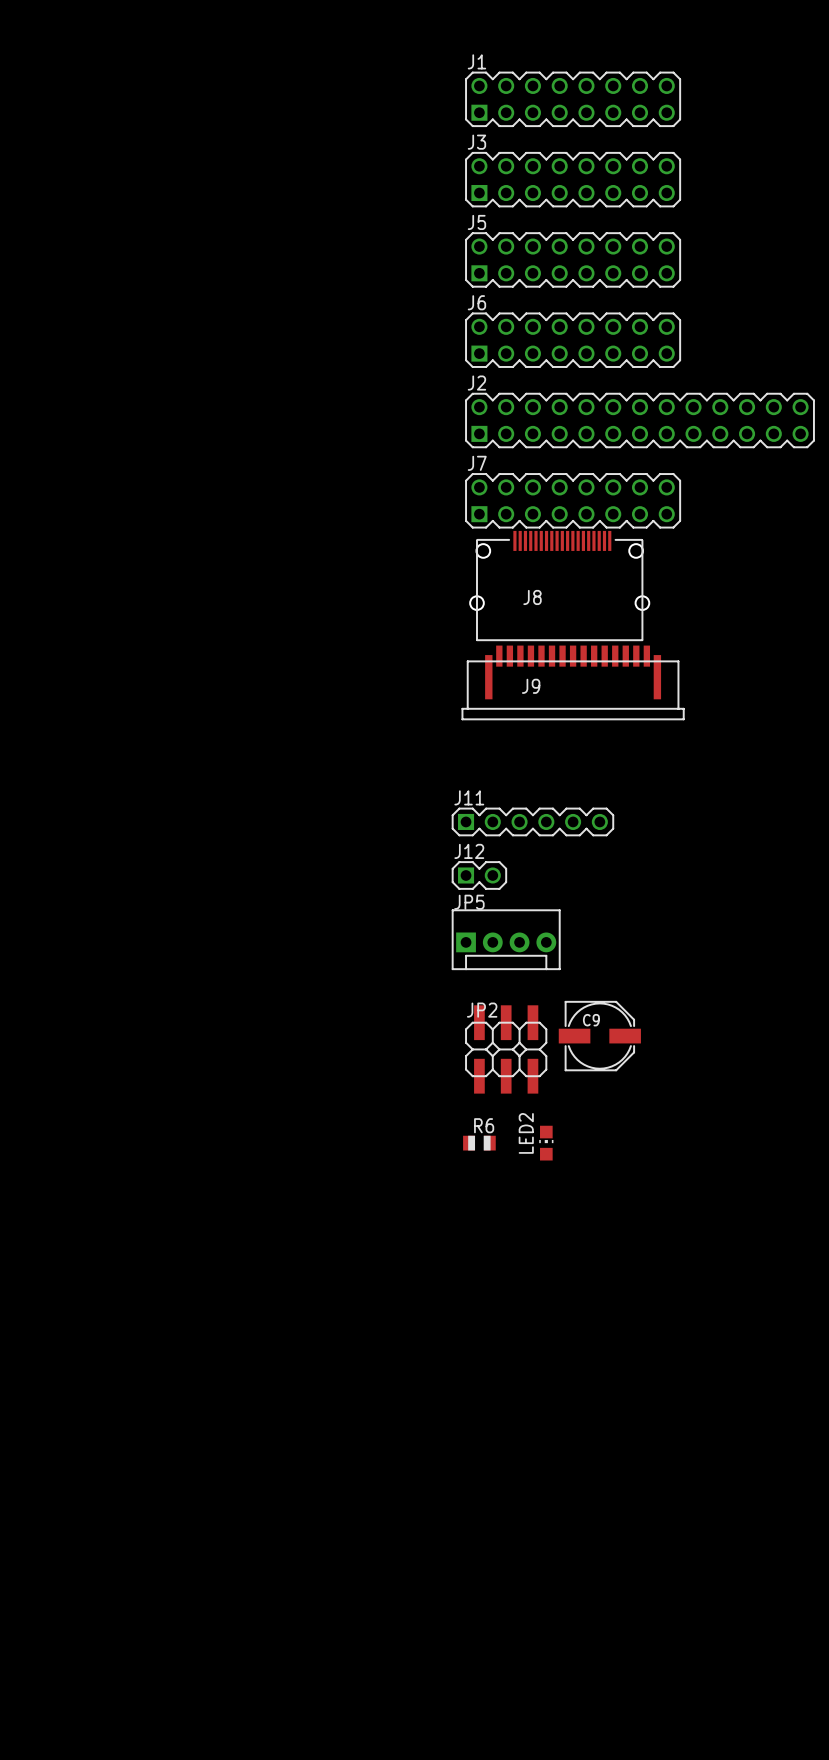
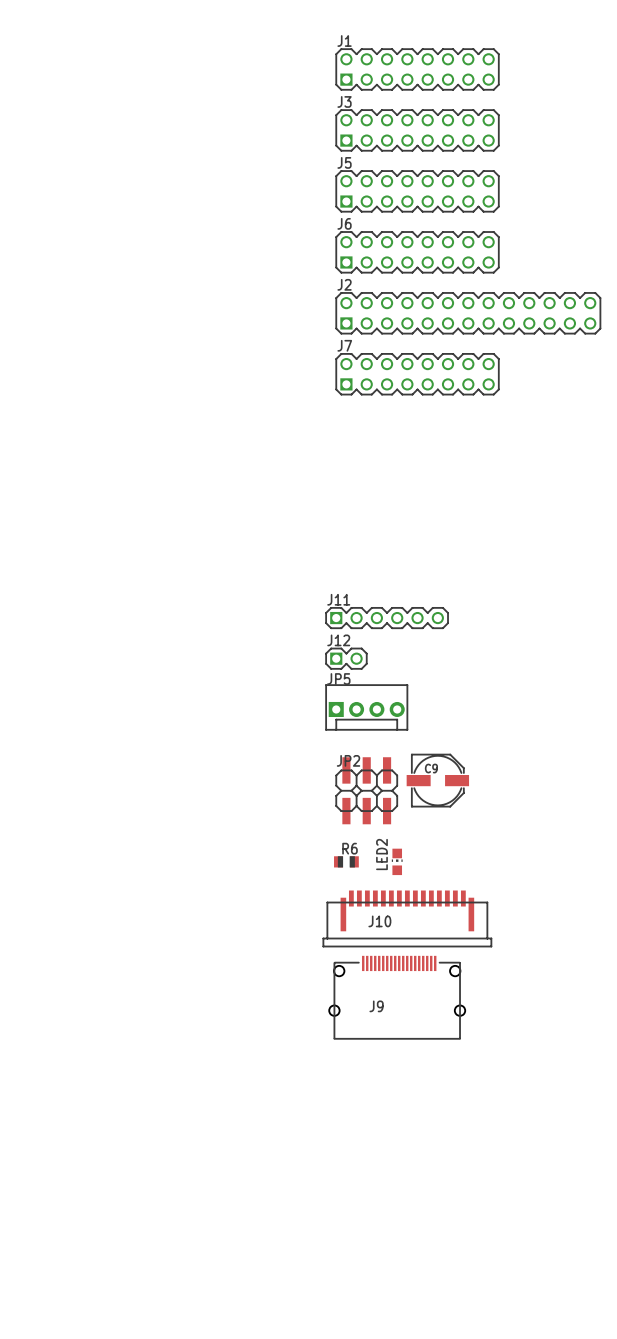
J8: (559, 585) -> none
J9 footprint: [461, 645, 685, 721] -> [329, 955, 466, 1040]
J10: none -> (407, 918)

